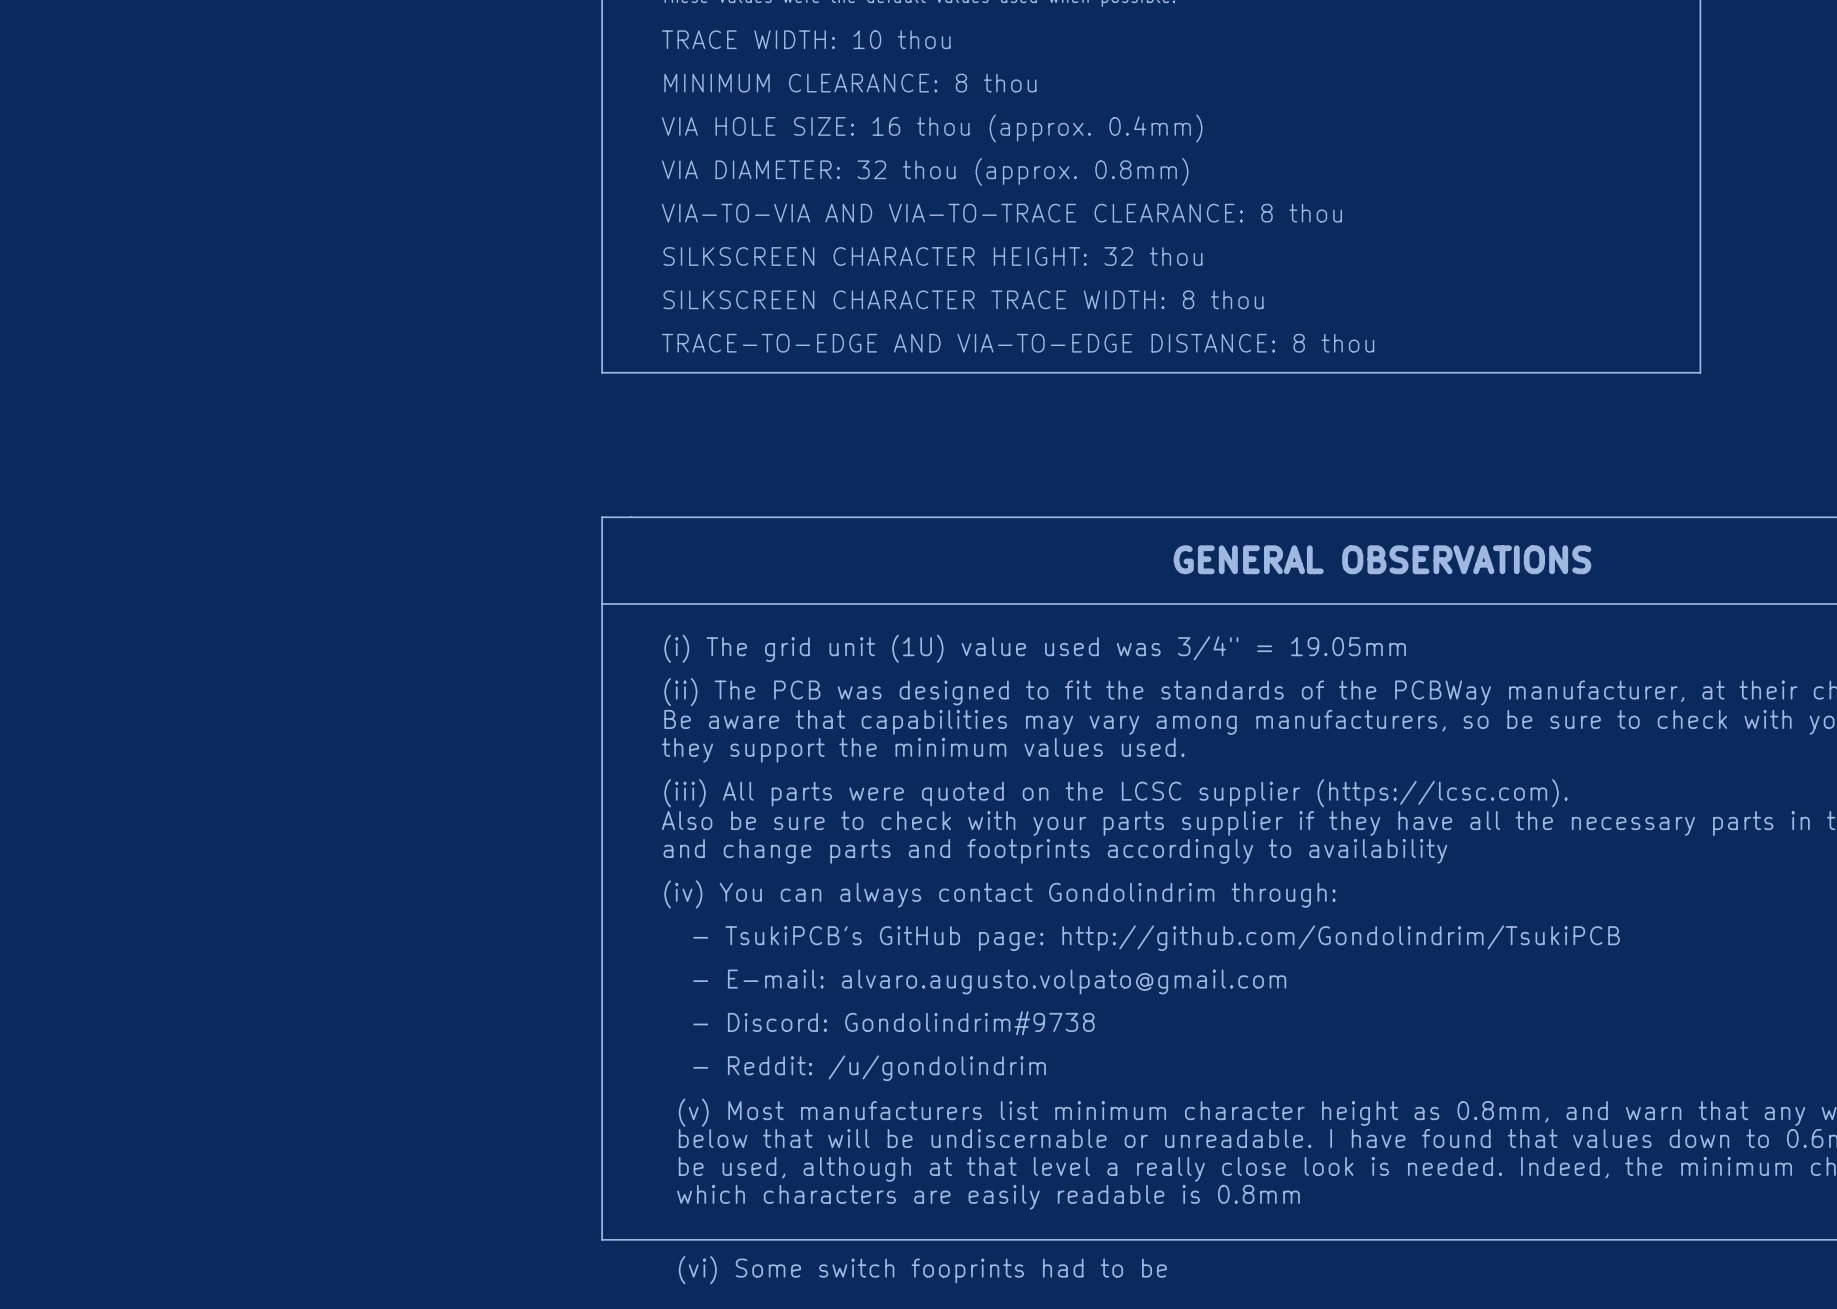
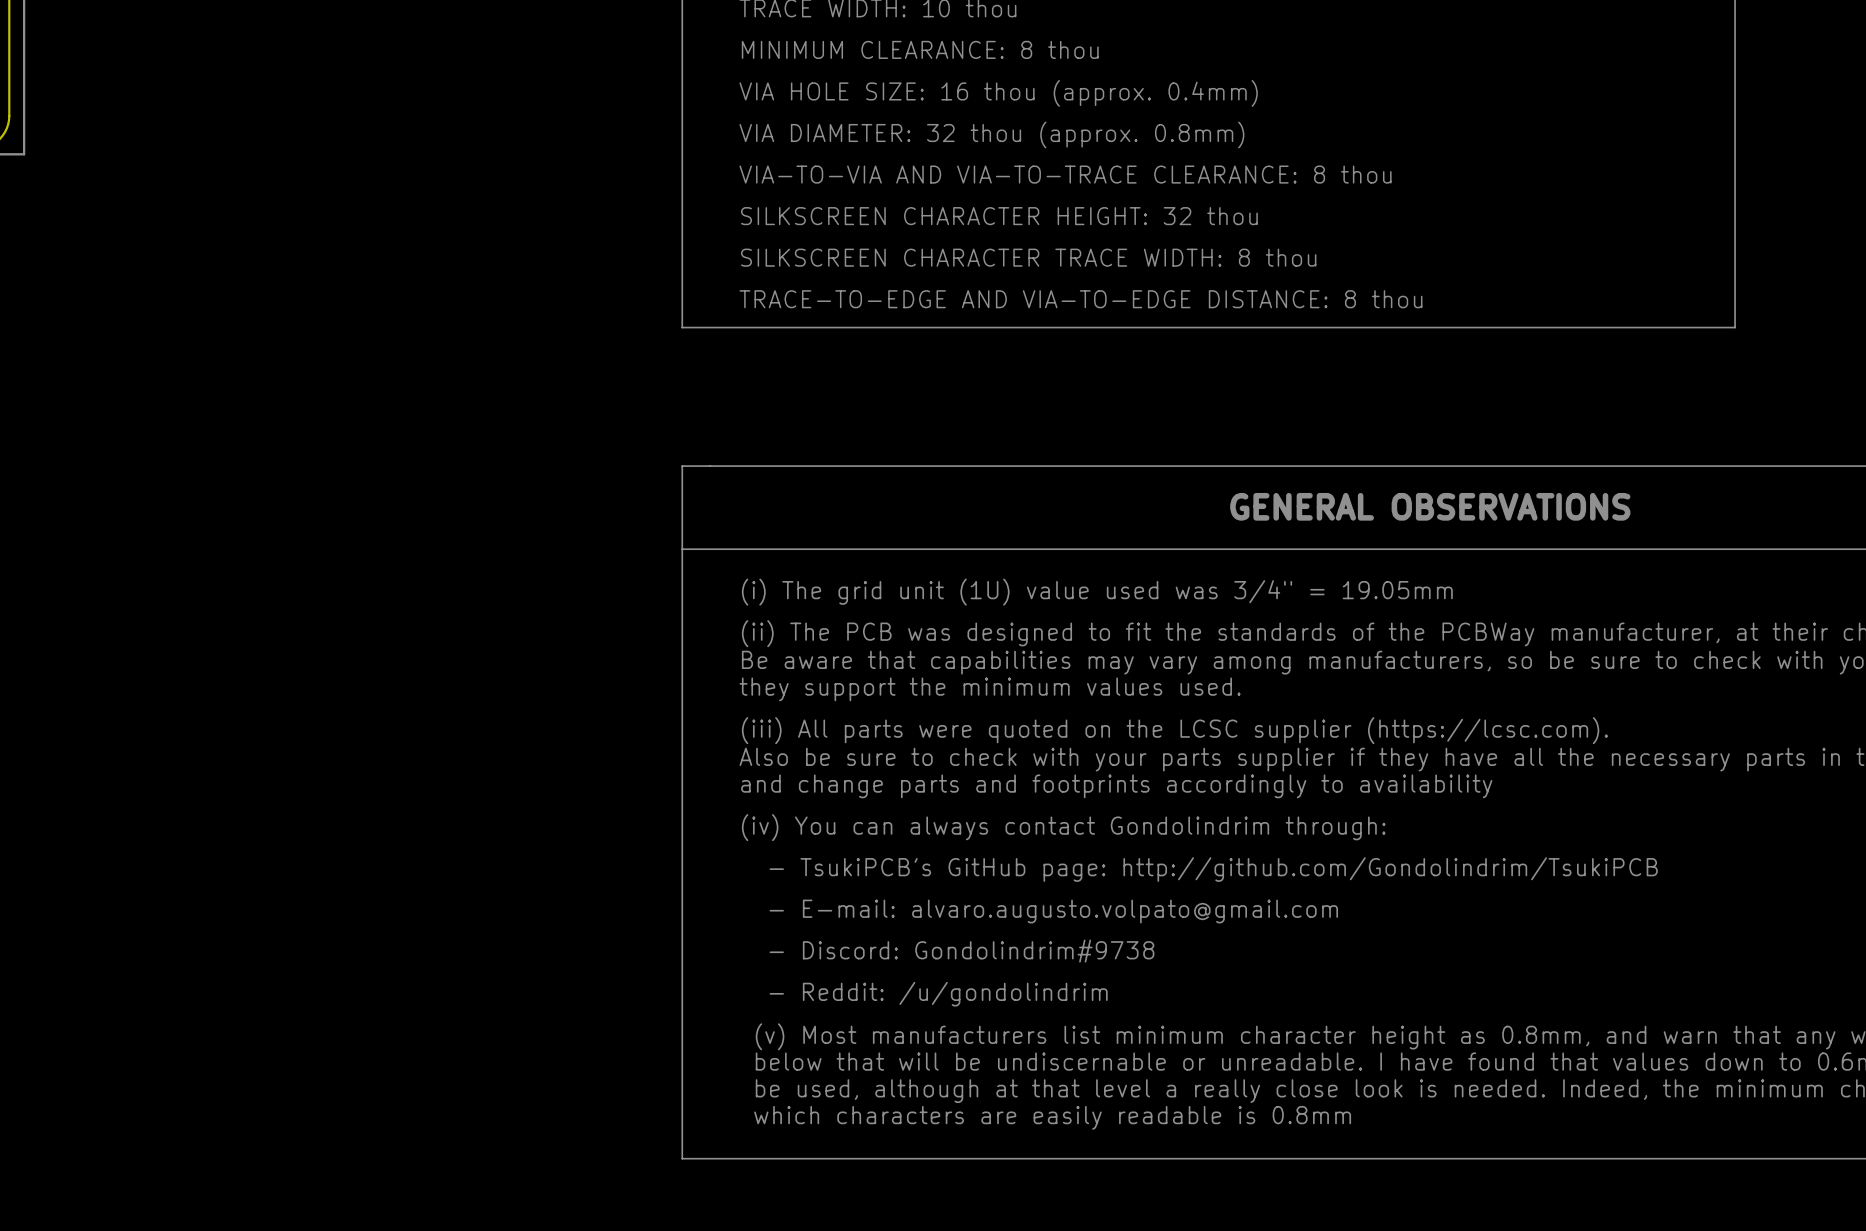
text: (vi) Some switch fooprints had to be (922, 1270) -> none

